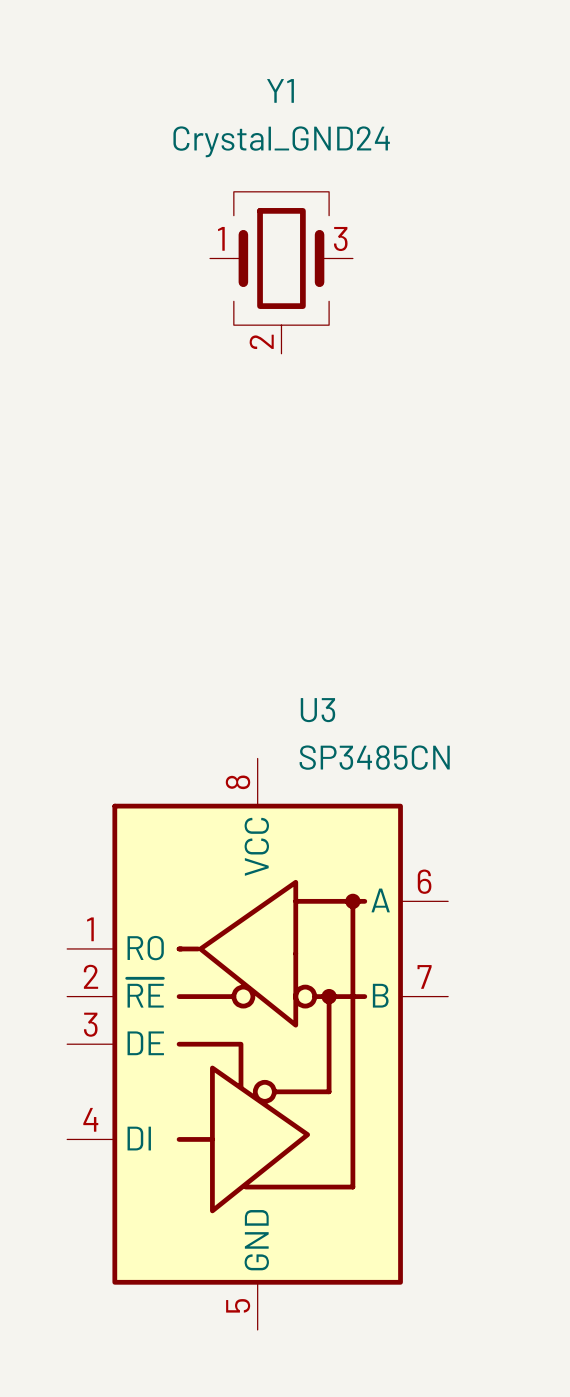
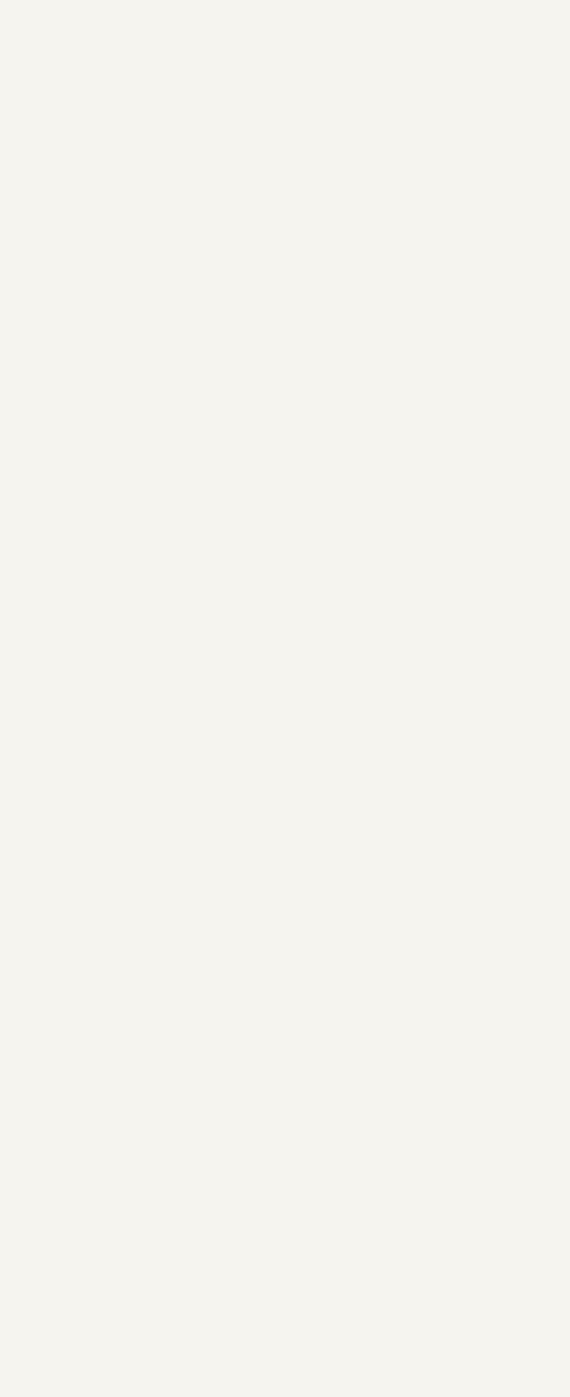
Y1: Crystal_GND24 (281, 272) -> none
U3: SP3485CN (257, 1044) -> none

